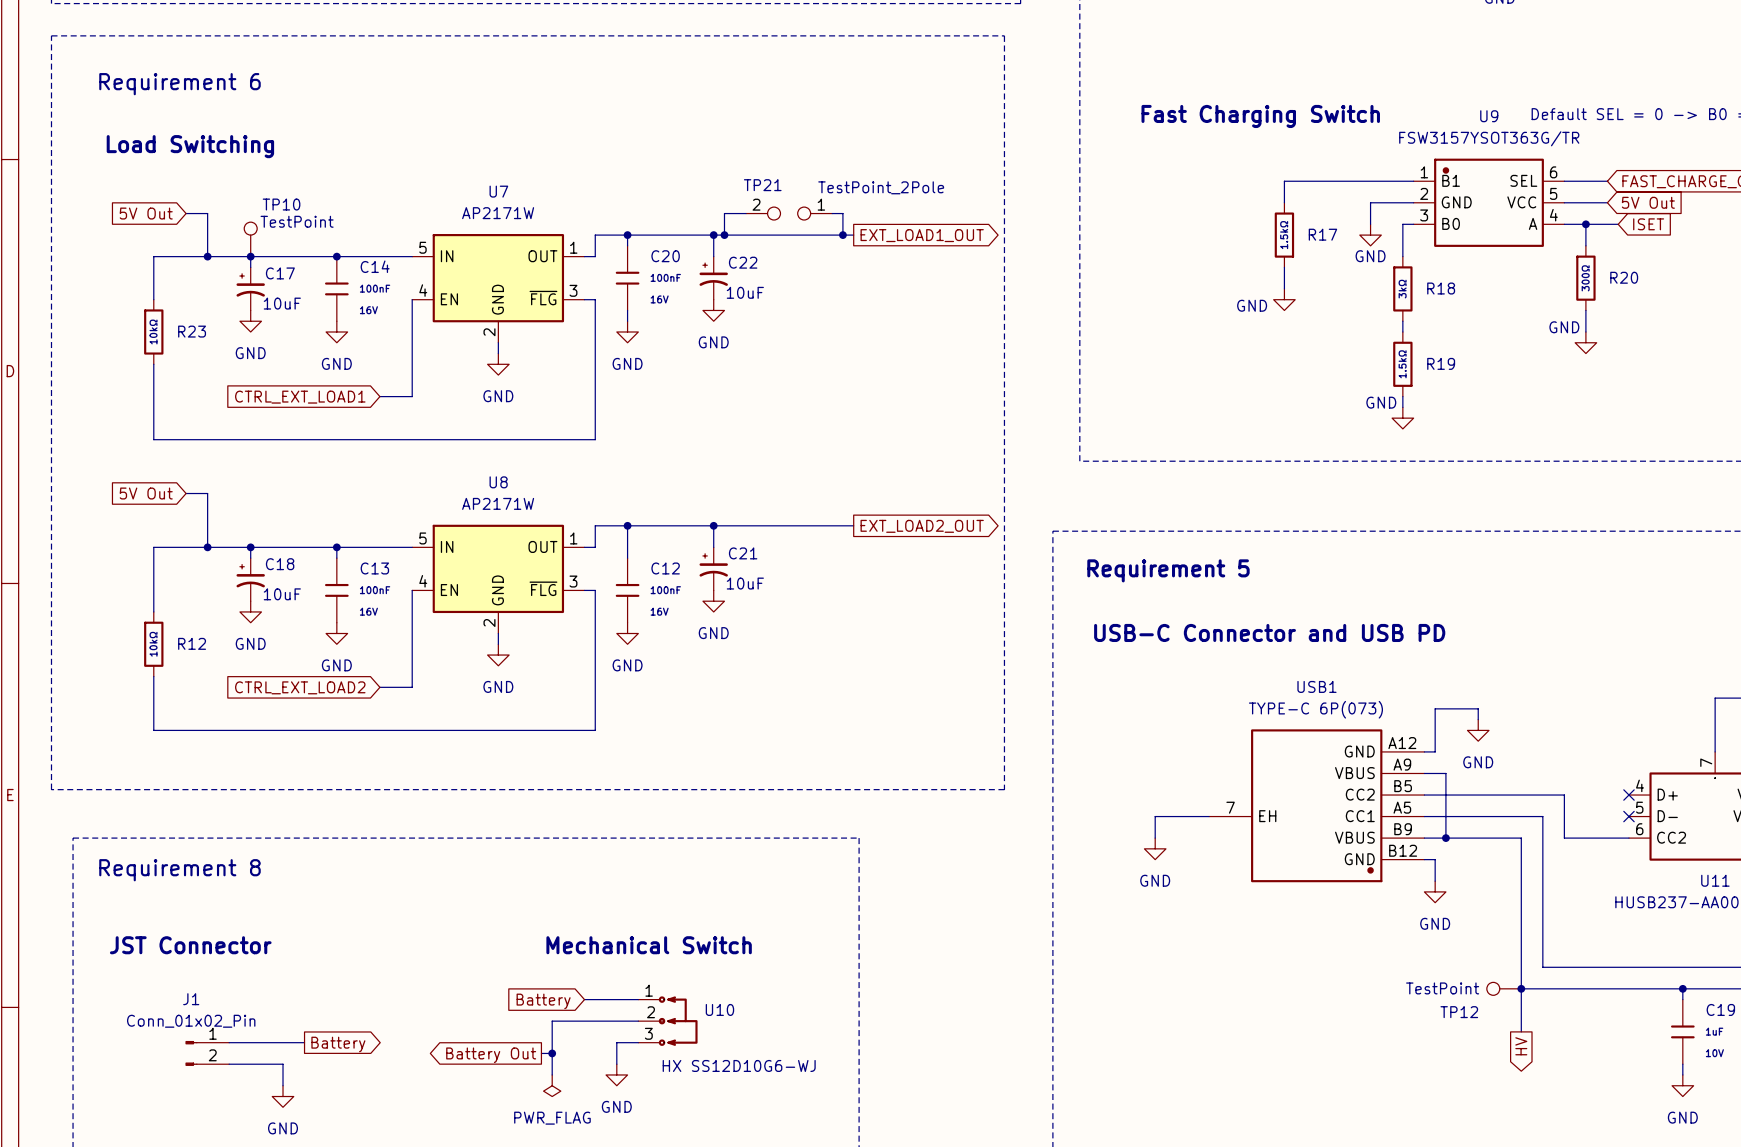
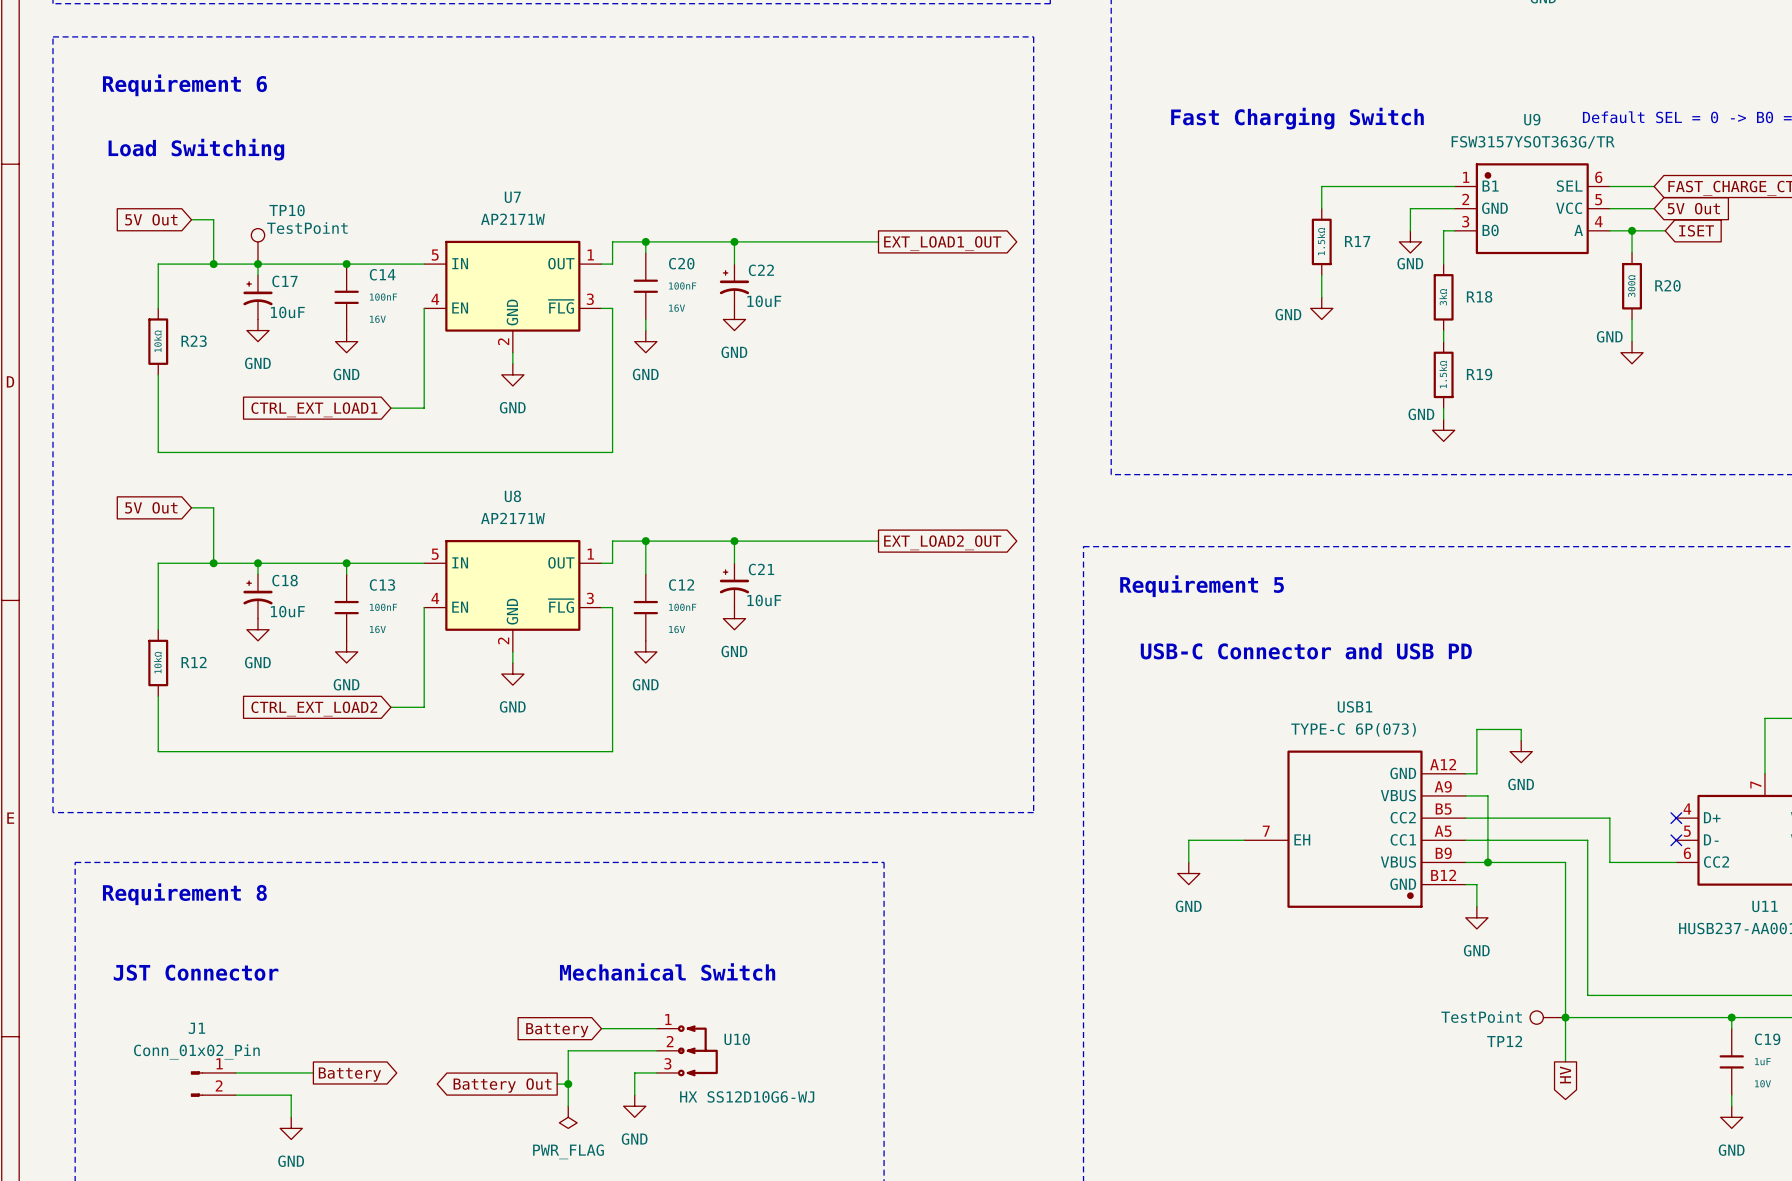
wire: (746, 213) (724, 213) (724, 235) -> none
TP21: TestPoint_2Pole (789, 213) -> none
wire: (832, 213) (842, 213) (842, 235) -> none
junction: (724, 235) -> none
junction: (842, 235) -> none

